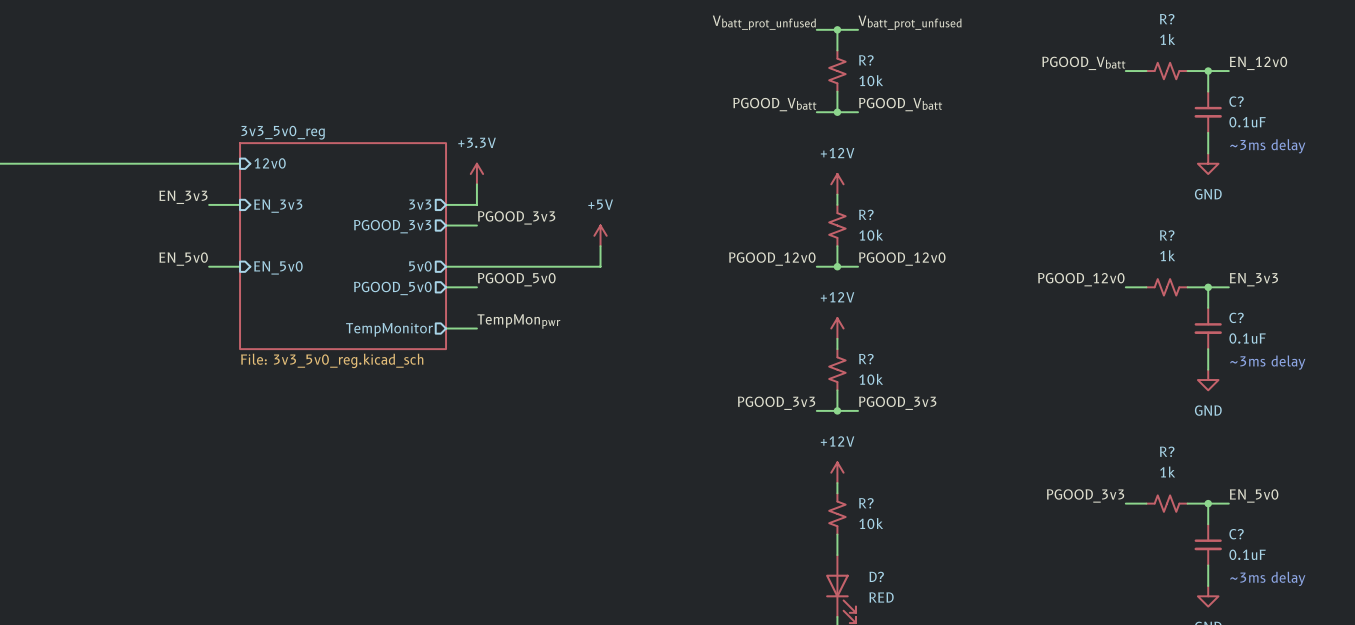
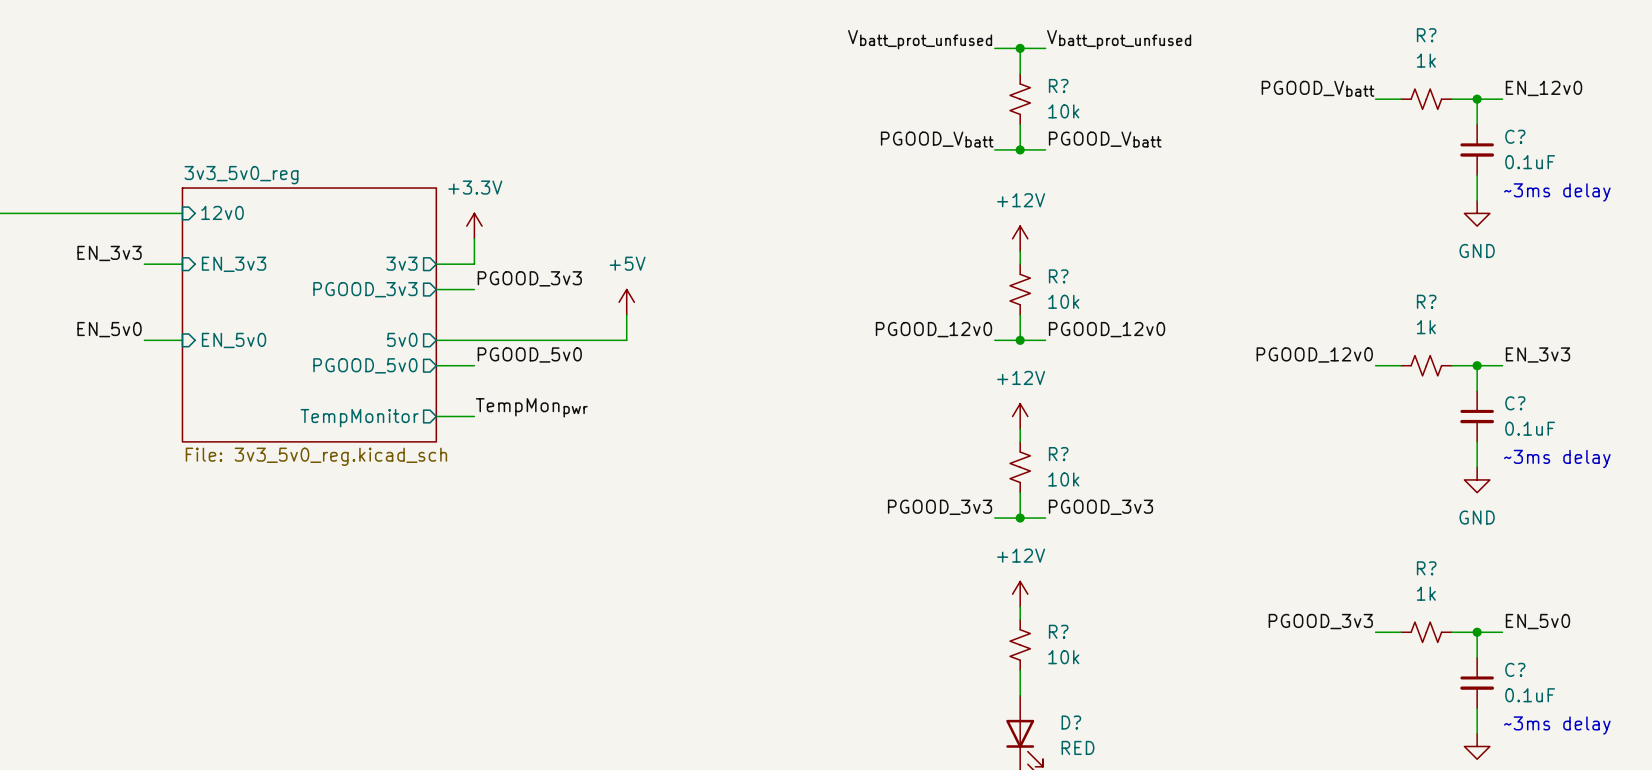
wire: (157, 163) (240, 163) -> none
sheet pin position: 12v0 (270, 163) -> 12v0 (222, 212)
power symbol position: +3.3V (476, 174) -> +3.3V (474, 226)
wire: (476, 184) (476, 204) (446, 204) -> (474, 238) (474, 264) (436, 264)
label position: EN_3v3 (183, 197) -> EN_3v3 (109, 253)
wire: (209, 204) (240, 204) -> (144, 264) (182, 264)
sheet pin position: 3v3 (420, 204) -> 3v3 (401, 263)
sheet pin position: EN_3v3 (278, 206) -> EN_3v3 (234, 264)
label position: PGOOD_3v3 (516, 217) -> PGOOD_3v3 (529, 278)
wire: (446, 225) (476, 225) -> (436, 289) (474, 289)
sheet pin position: PGOOD_3v3 (392, 226) -> PGOOD_3v3 (365, 289)
power symbol position: +5V (600, 235) -> +5V (626, 302)
sheet 3v3_5v0_reg position: (343, 246) -> (309, 314)
wire: (600, 246) (600, 266) (518, 266) -> (626, 314) (626, 340)
label position: EN_5v0 (183, 259) -> EN_5v0 (109, 329)
wire: (209, 266) (240, 266) -> (144, 340) (182, 340)
wire: none -> (436, 340) (537, 340)
sheet pin position: 5v0 (420, 266) -> 5v0 (402, 339)
sheet pin position: EN_5v0 (278, 267) -> EN_5v0 (234, 340)
label position: PGOOD_5v0 (516, 279) -> PGOOD_5v0 (529, 355)
wire: (446, 287) (476, 287) -> (436, 365) (474, 365)
sheet pin position: PGOOD_5v0 (392, 288) -> PGOOD_5v0 (365, 365)
label position: TempMonpwr (518, 321) -> TempMonpwr (531, 407)
wire: (446, 328) (476, 328) -> (436, 416) (474, 416)
sheet pin position: TempMonitor (389, 329) -> TempMonitor (359, 418)

